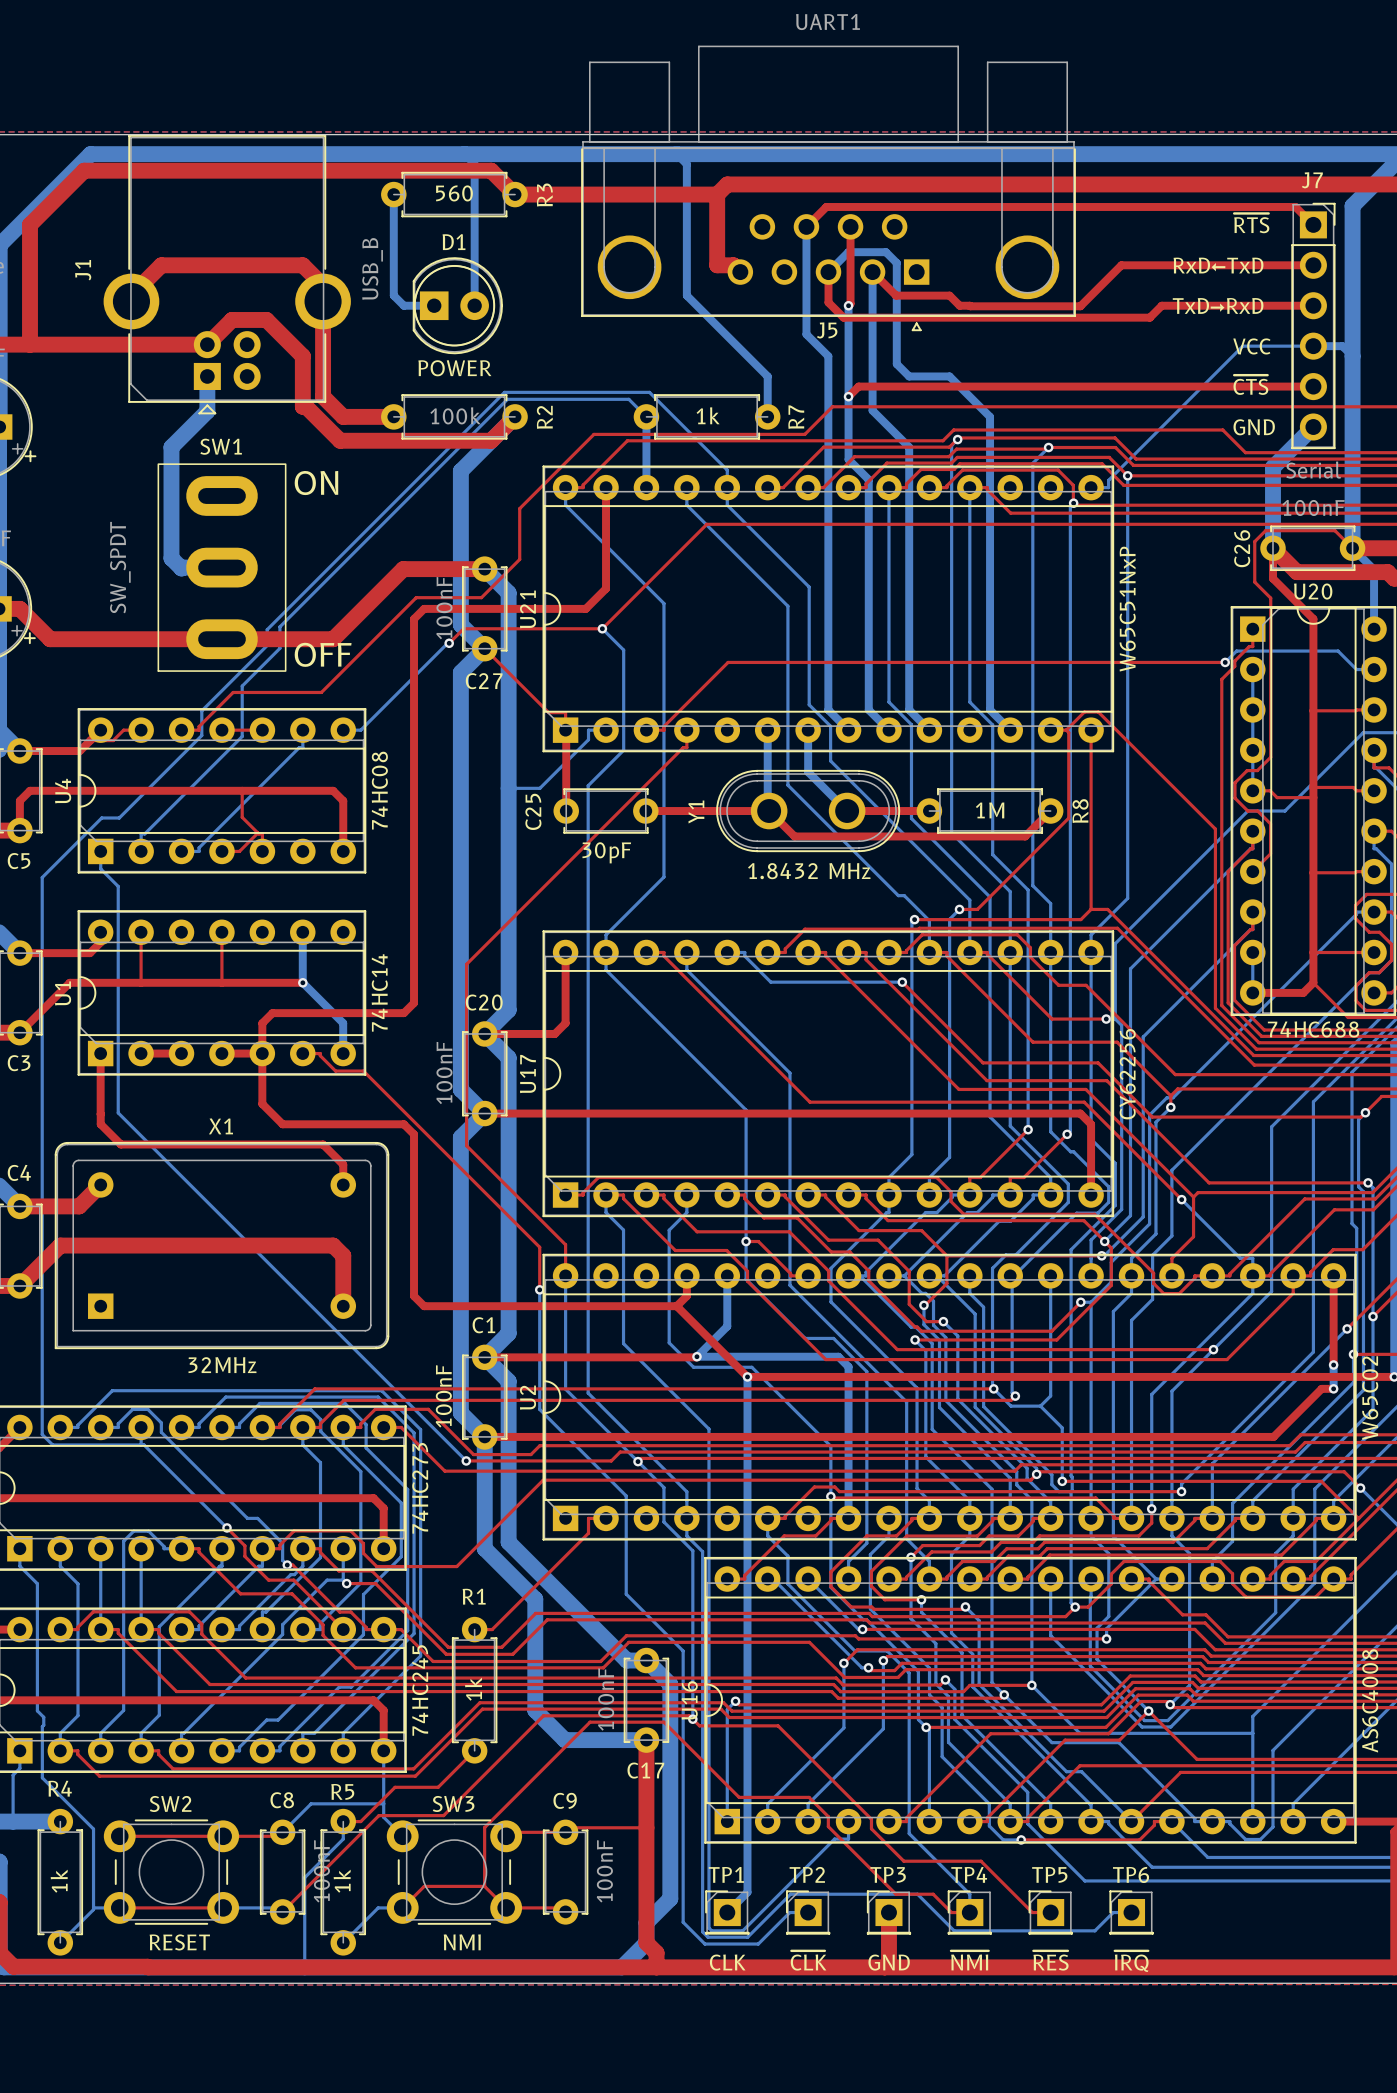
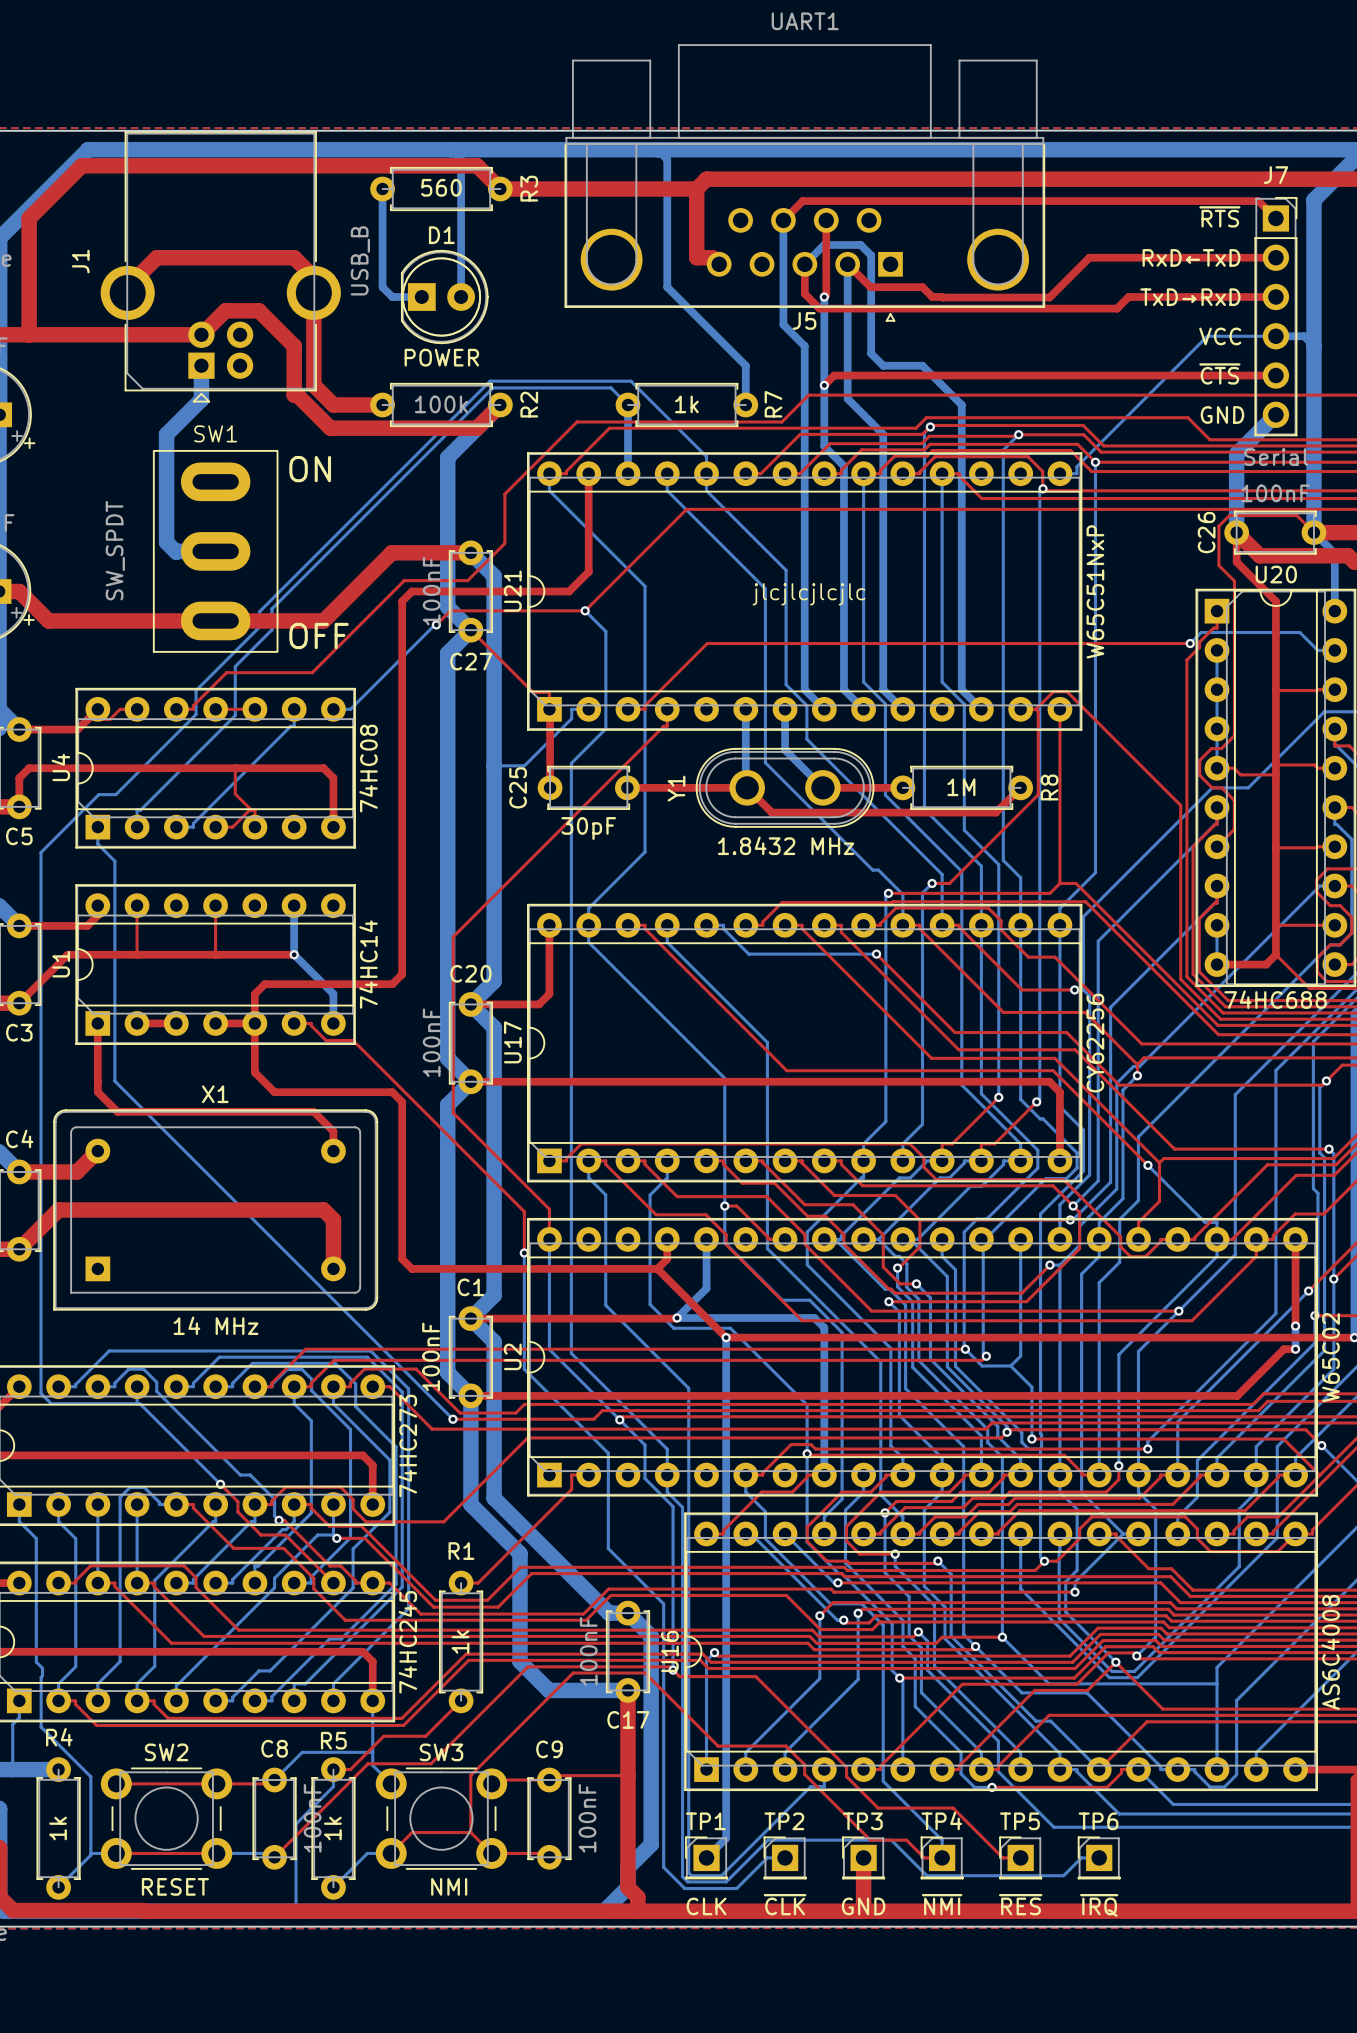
text: none -> jlcjlcjlcjlc (809, 594)
X1 value: 32MHz (222, 1365) -> 14 MHz (216, 1325)

